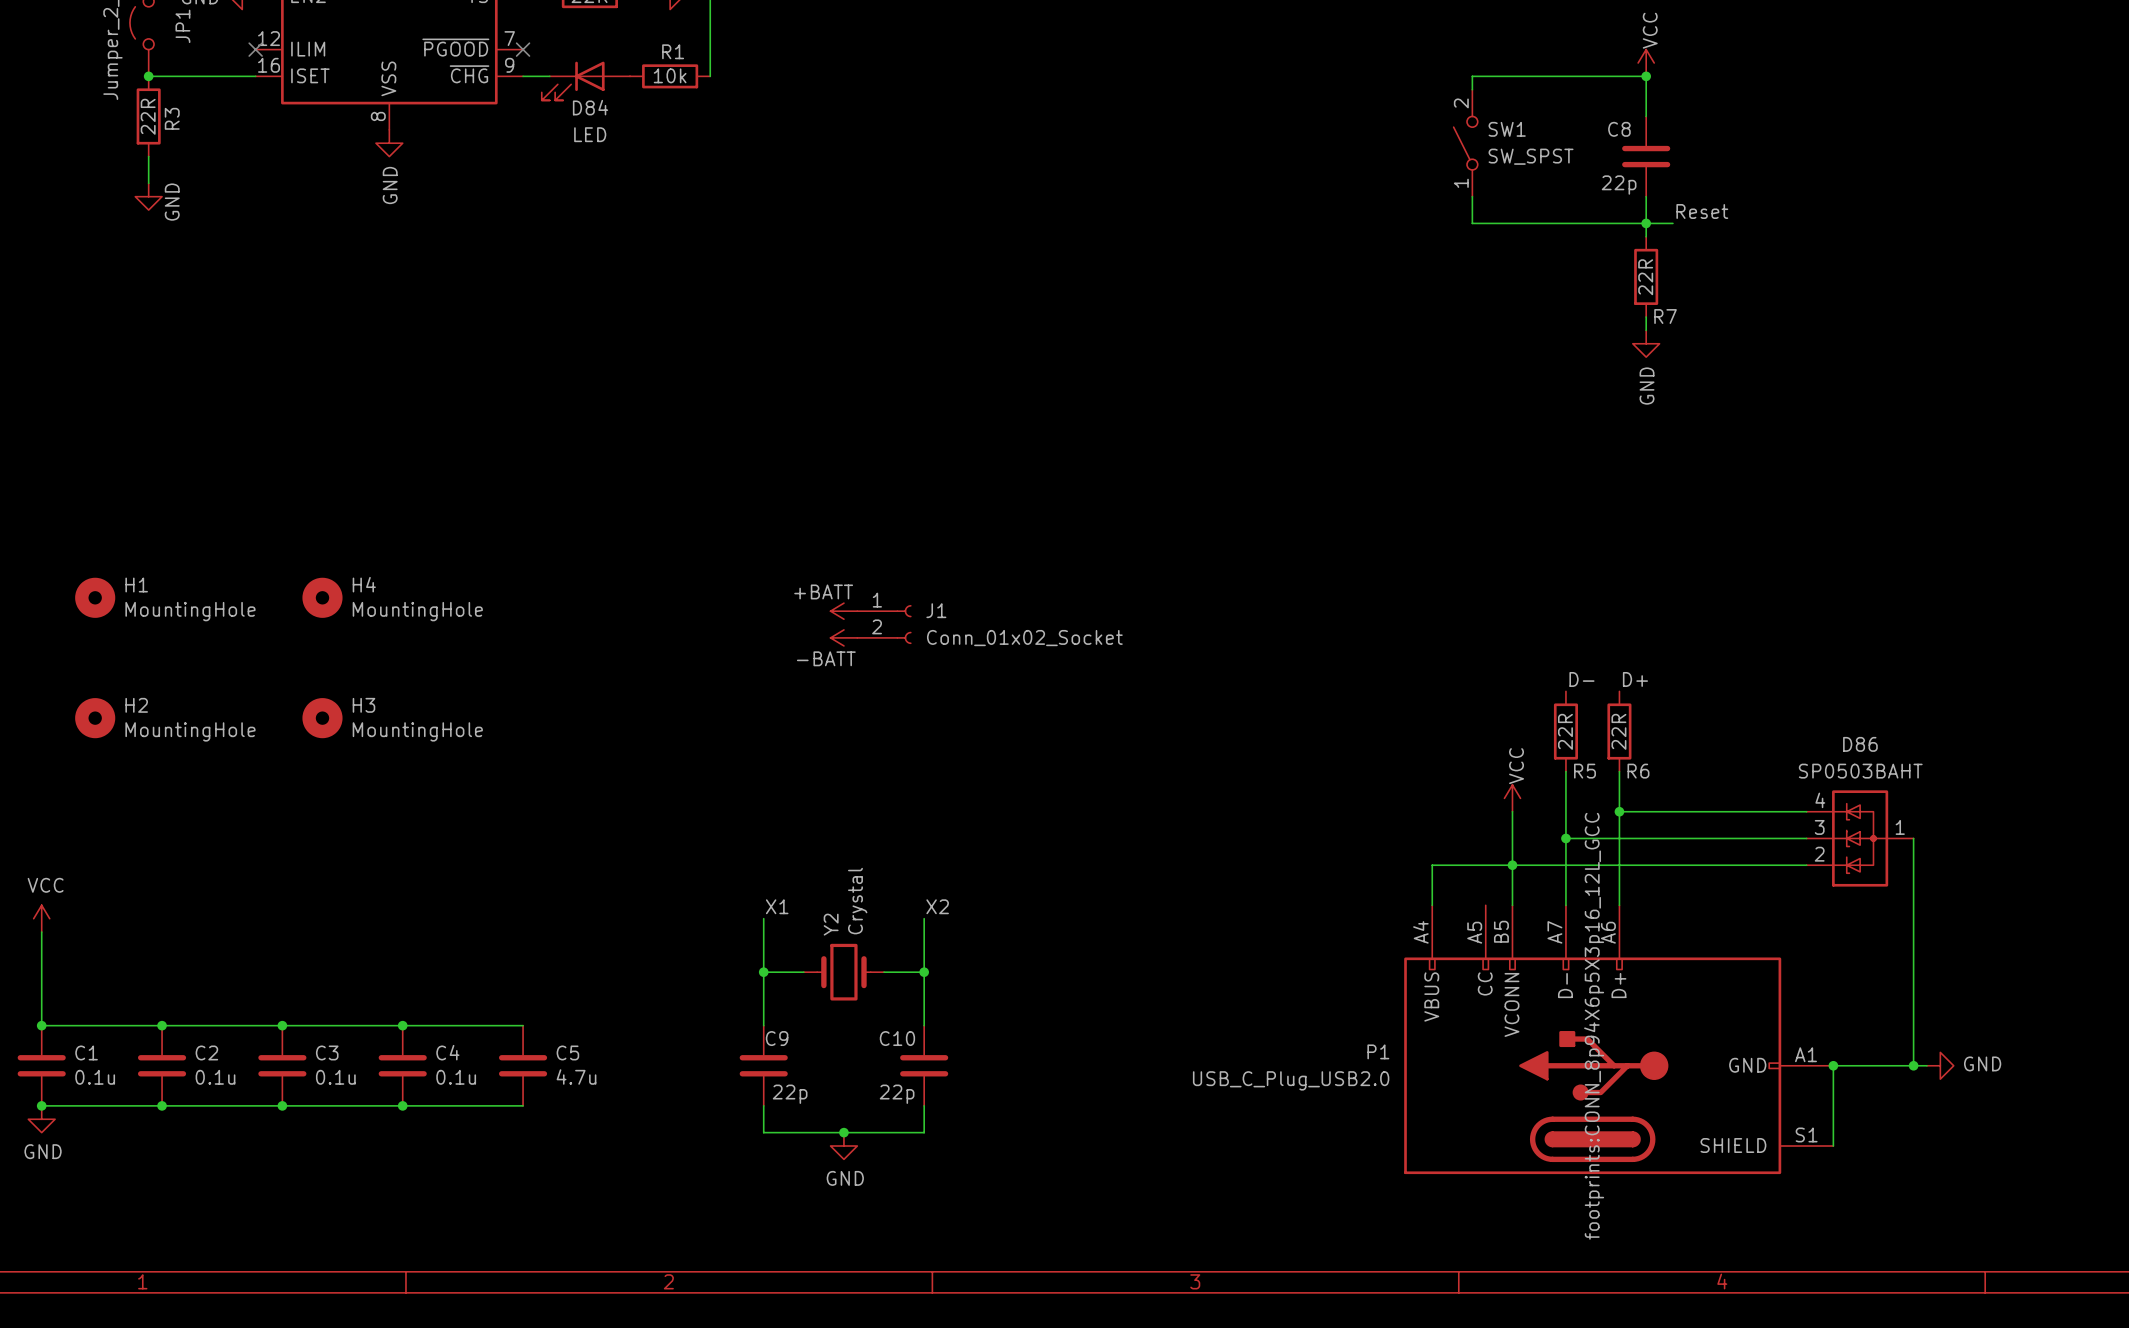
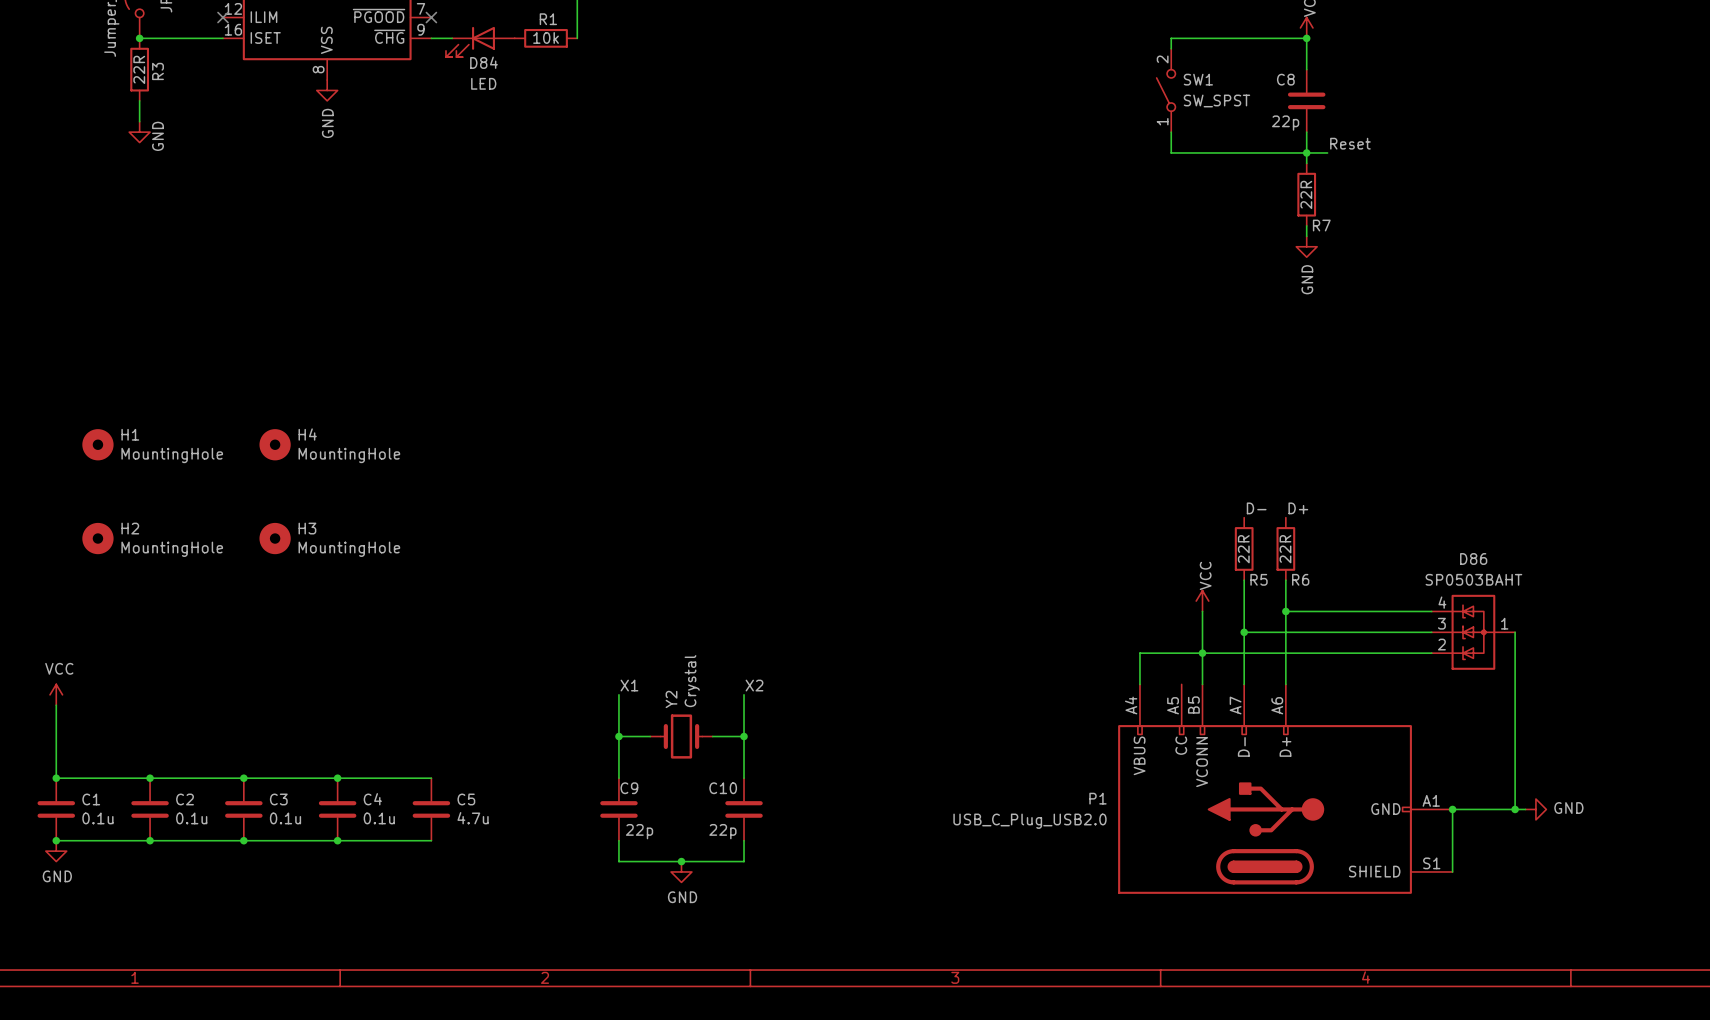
power symbol: +BATT (843, 611) -> none
J1: Conn_01x02_Socket (884, 624) -> none
power symbol: -BATT (843, 637) -> none
P1 text: footprints:CONN_8p94X6p5X3p16_12L_GCC (1594, 1026) -> none

